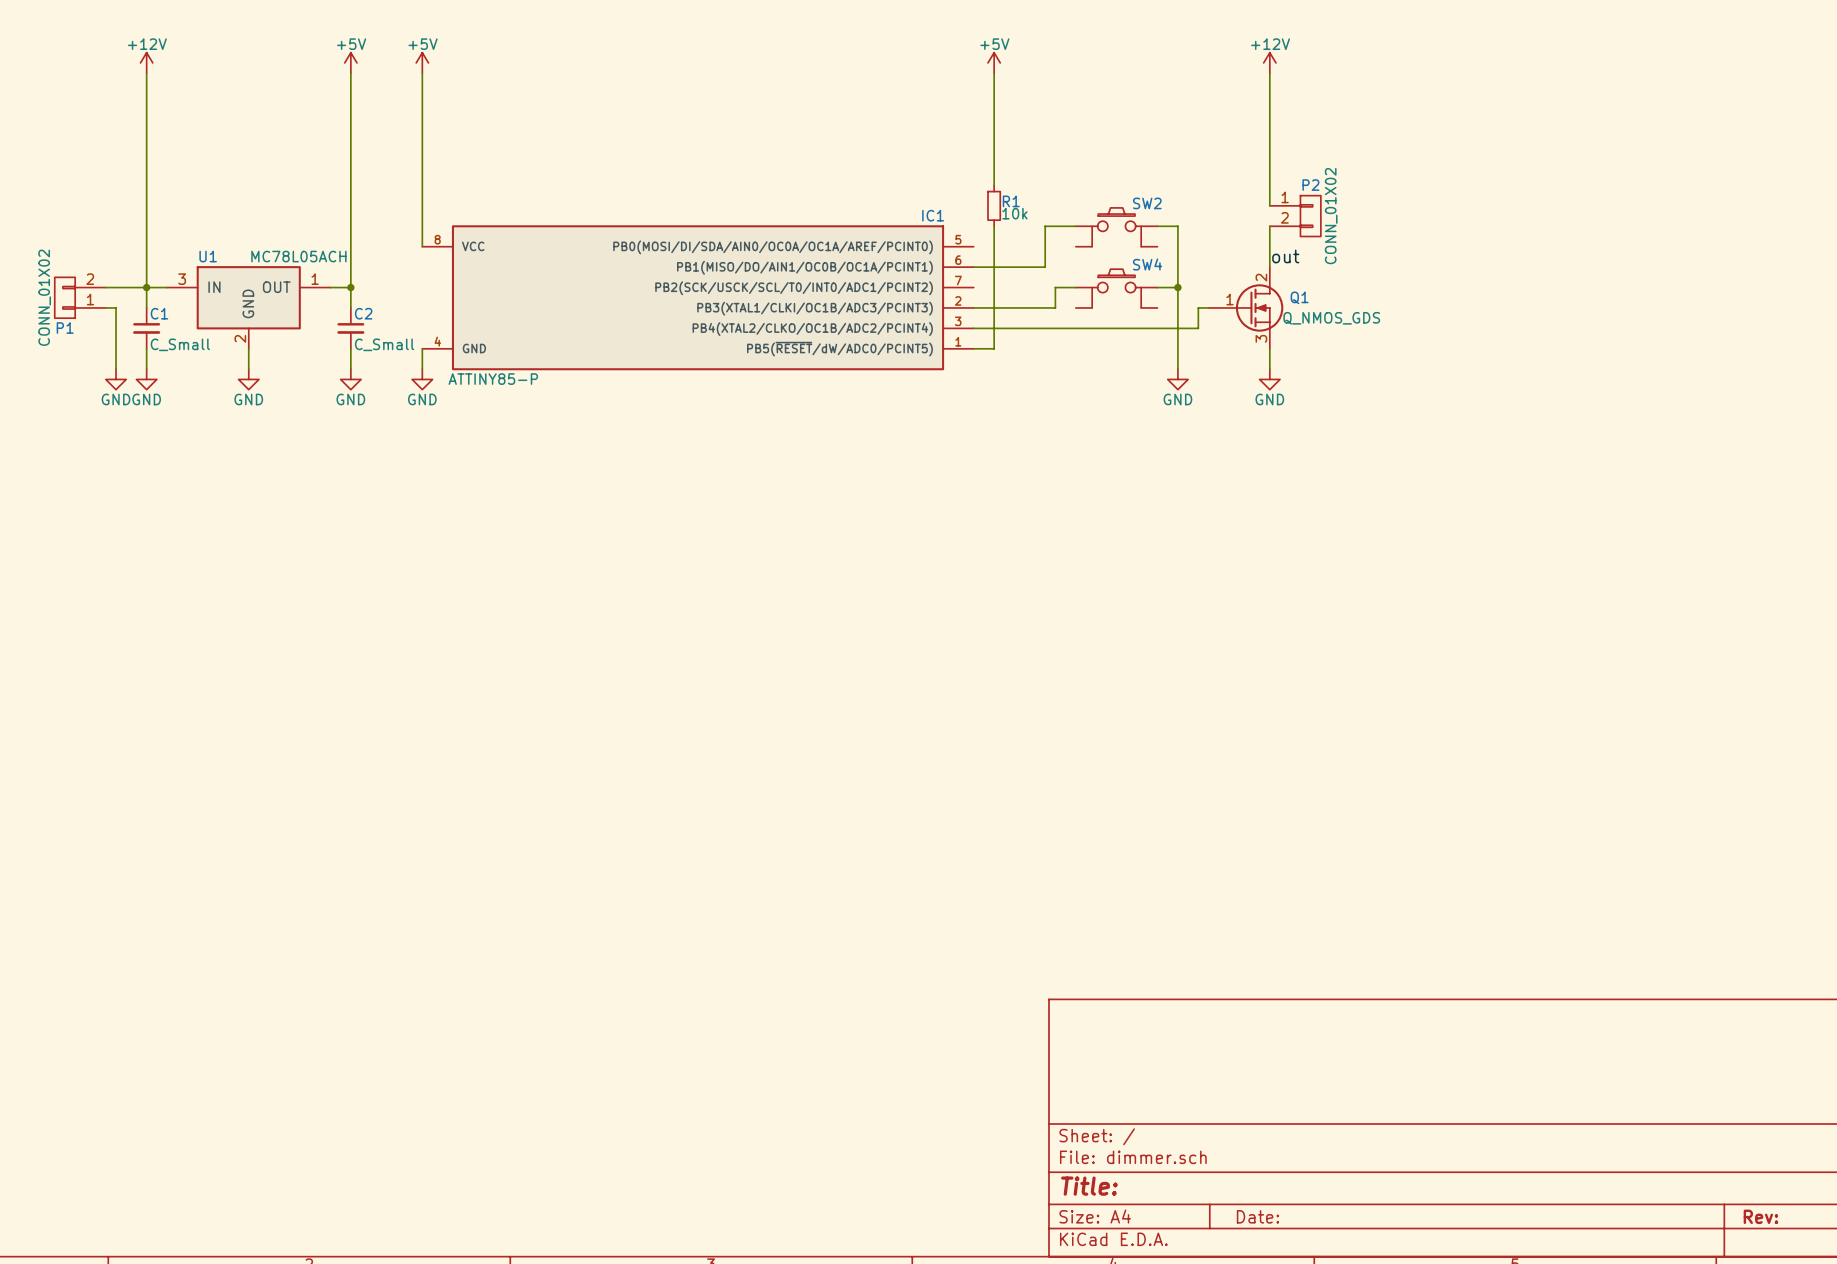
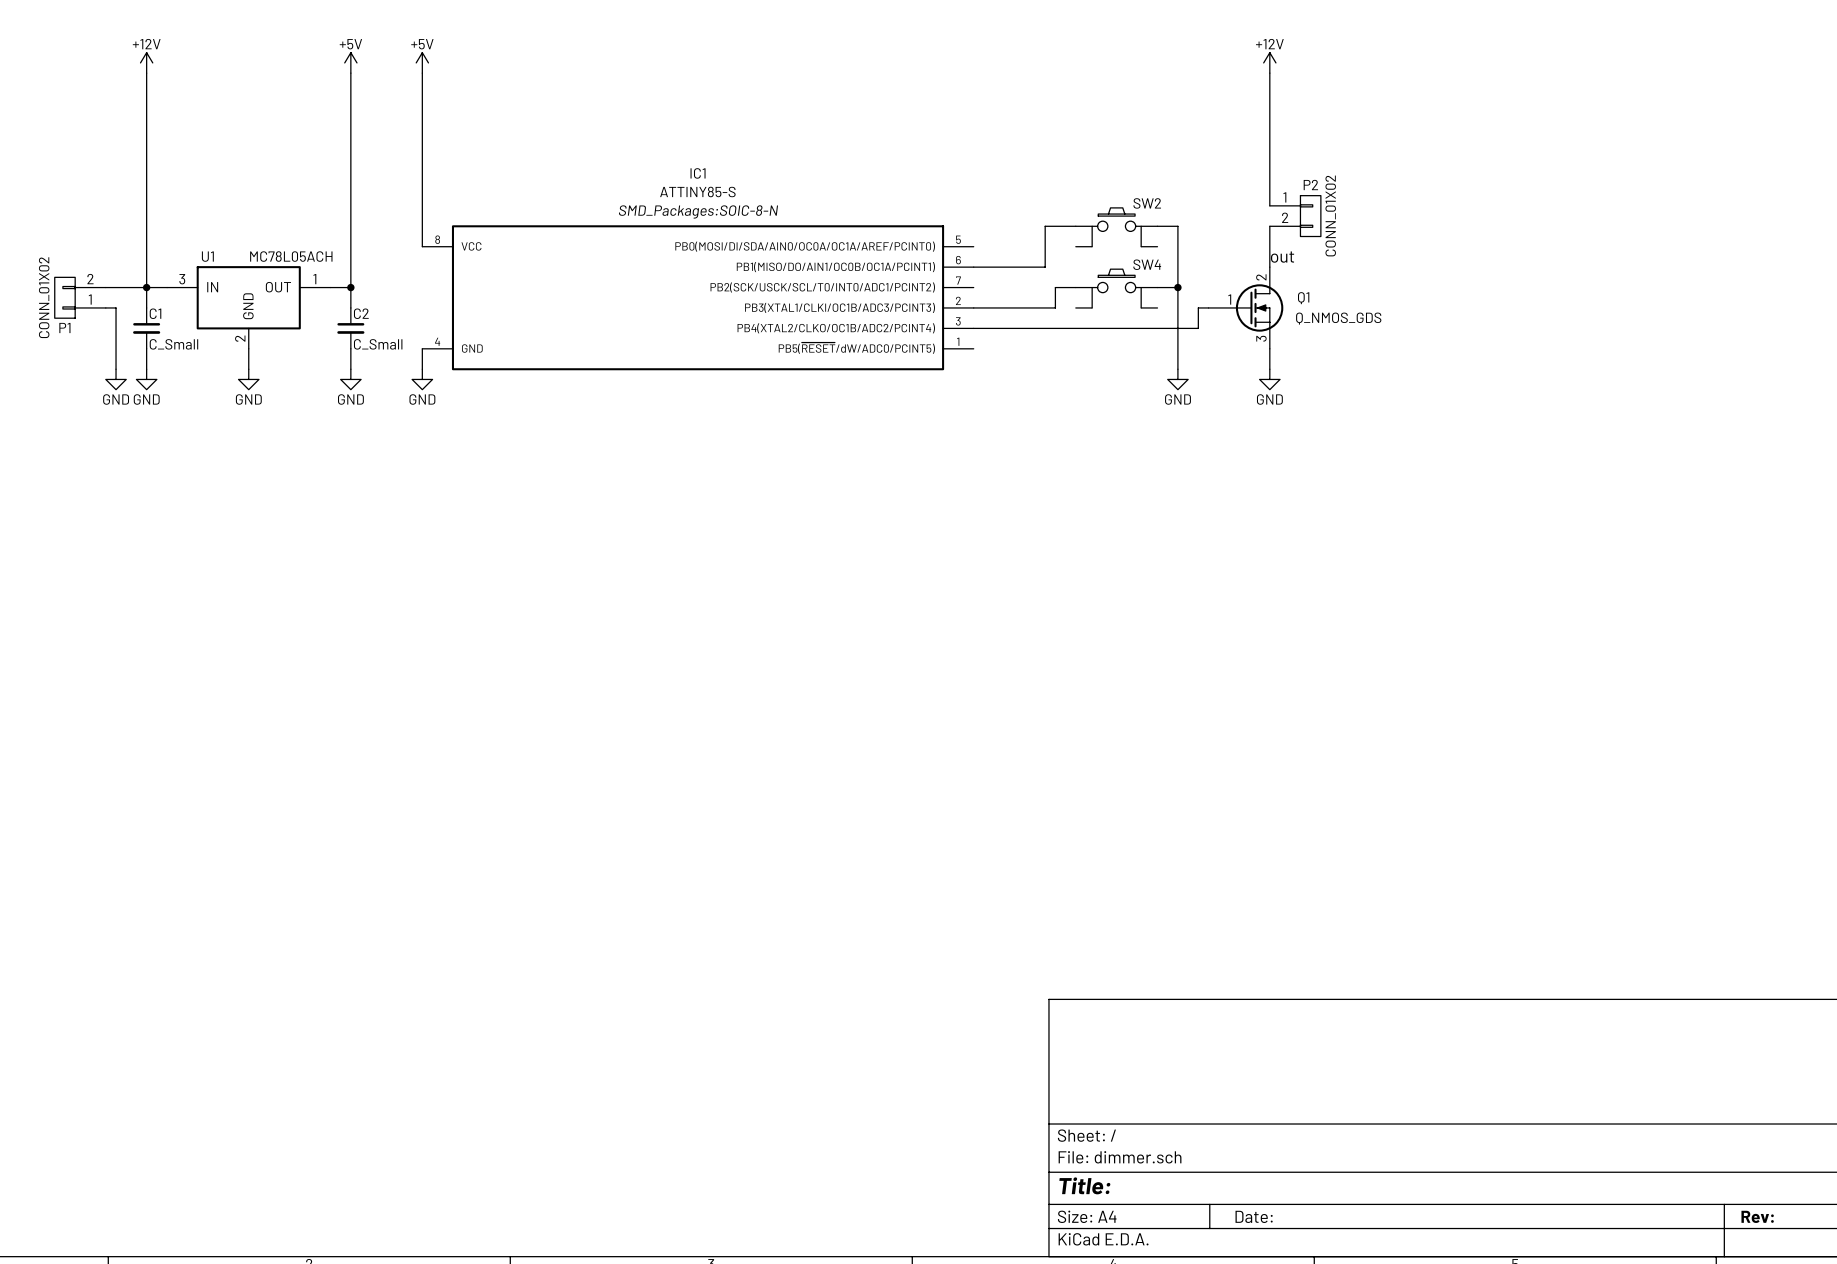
power symbol: +5V (994, 62) -> none
wire: (994, 73) (994, 185) -> none
R1: 10k (994, 205) -> none
IC1 text: none -> SMD_Packages:SOIC-8-N (698, 211)
IC1 name position: IC1 (933, 215) -> IC1 (698, 173)
wire: (994, 226) (994, 348) (973, 348) -> none
IC1 value: ATTINY85-P (493, 379) -> ATTINY85-S (697, 191)

